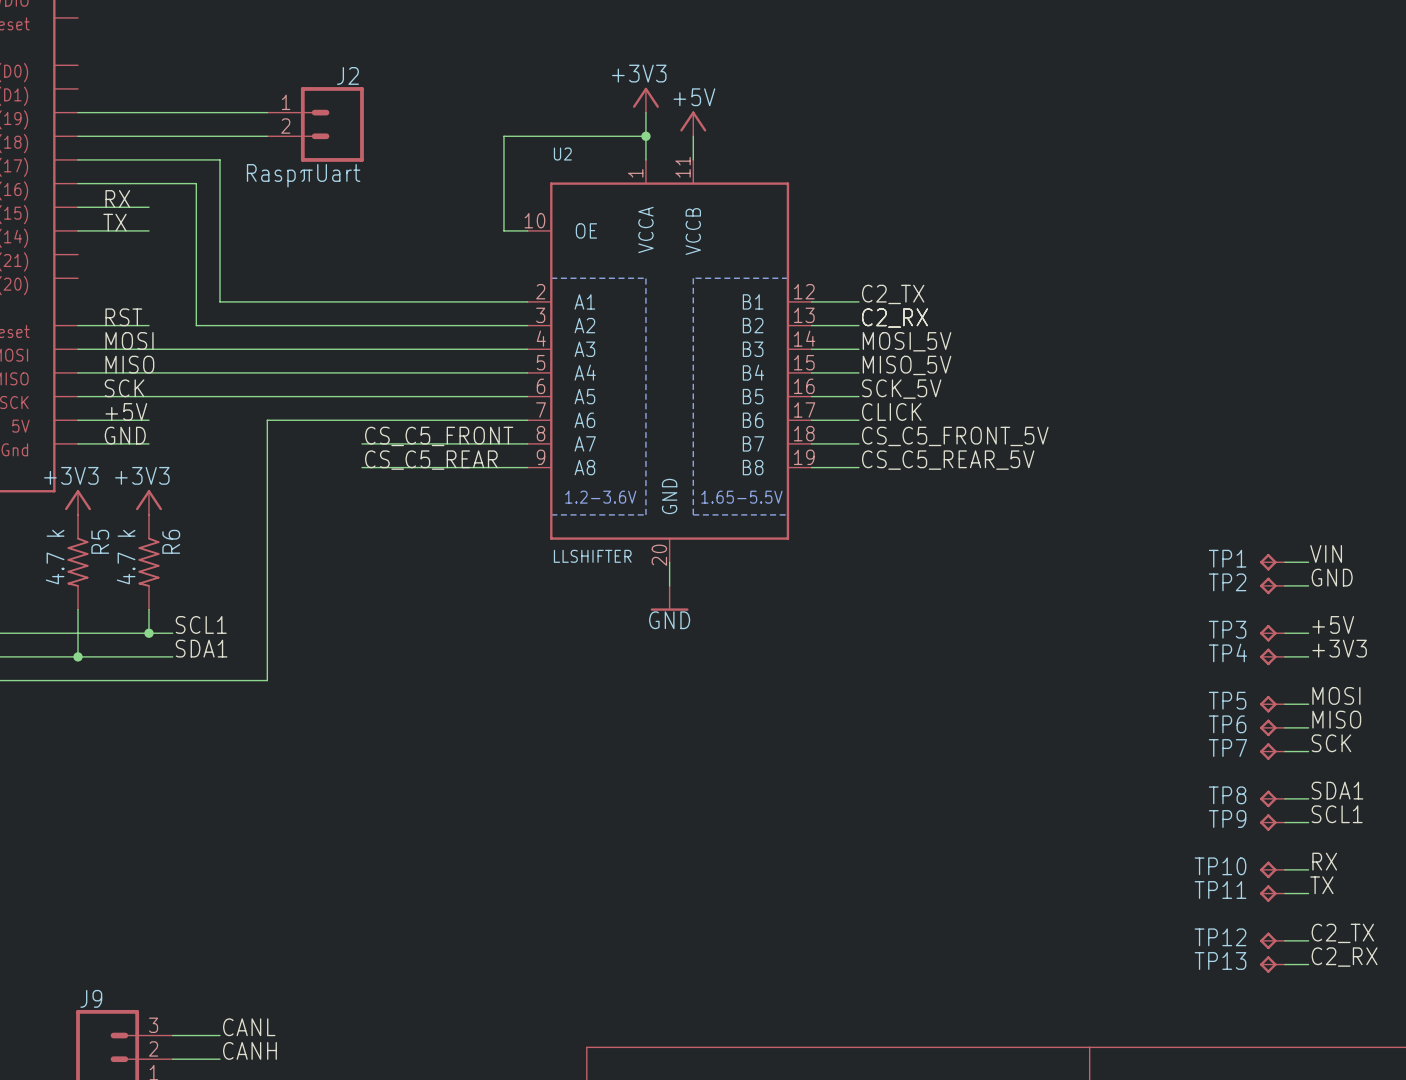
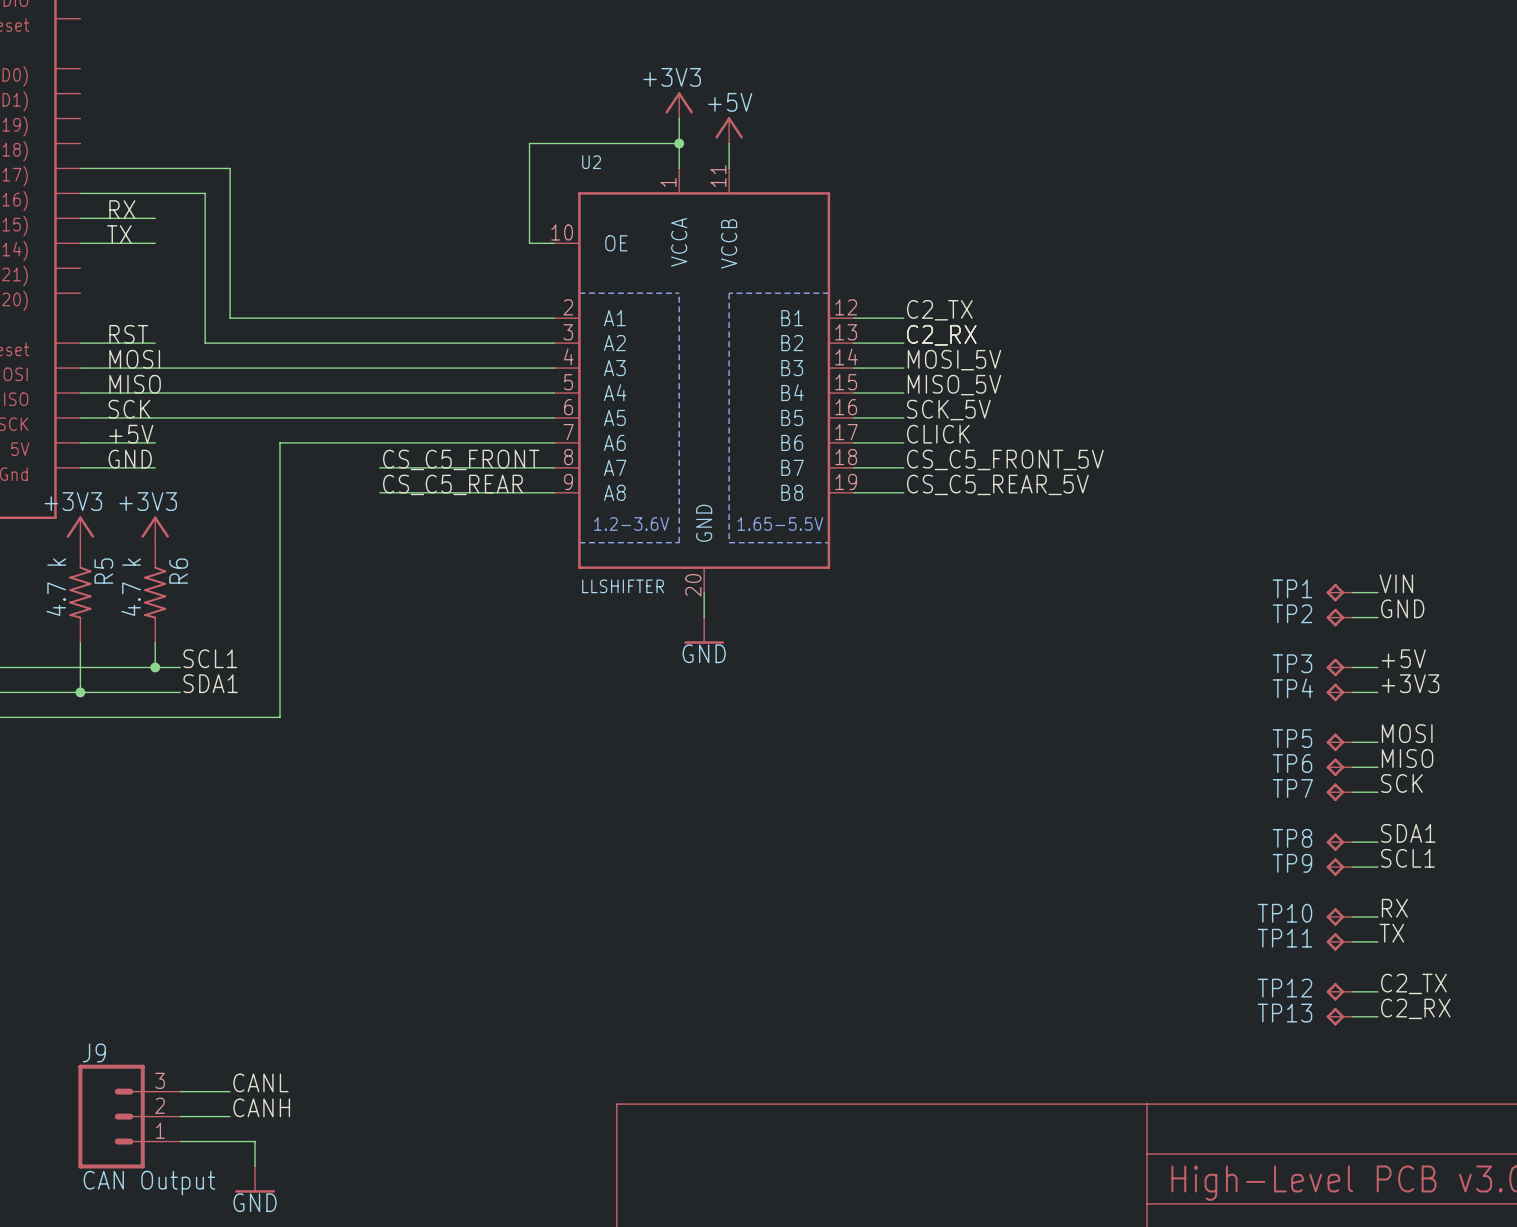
wire: (78, 112) (267, 112) -> none
J2: RaspπUart (315, 124) -> none
wire: (78, 136) (267, 136) -> none

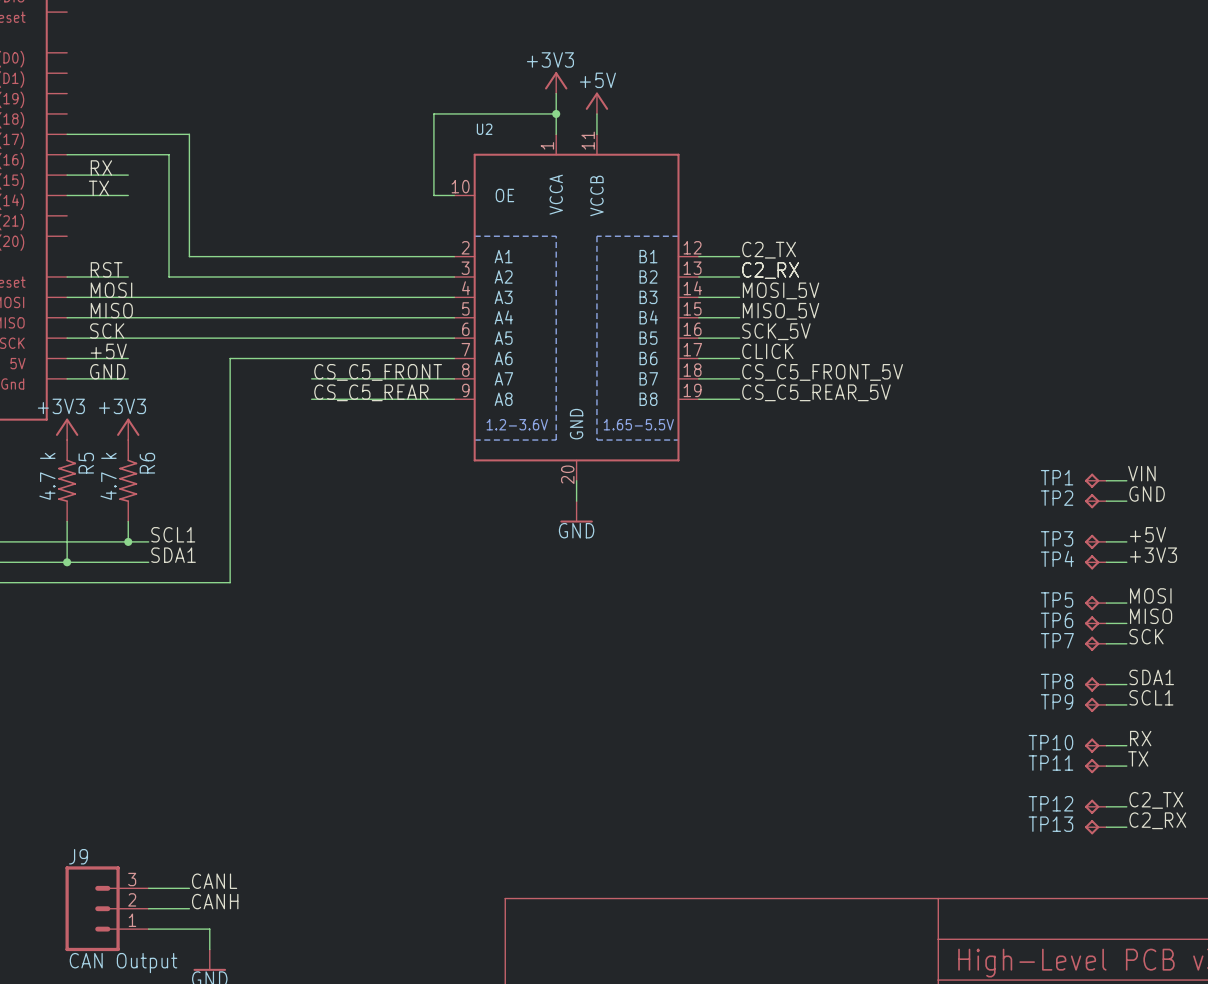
U2 value: LLSHIFTER (623, 586) -> none

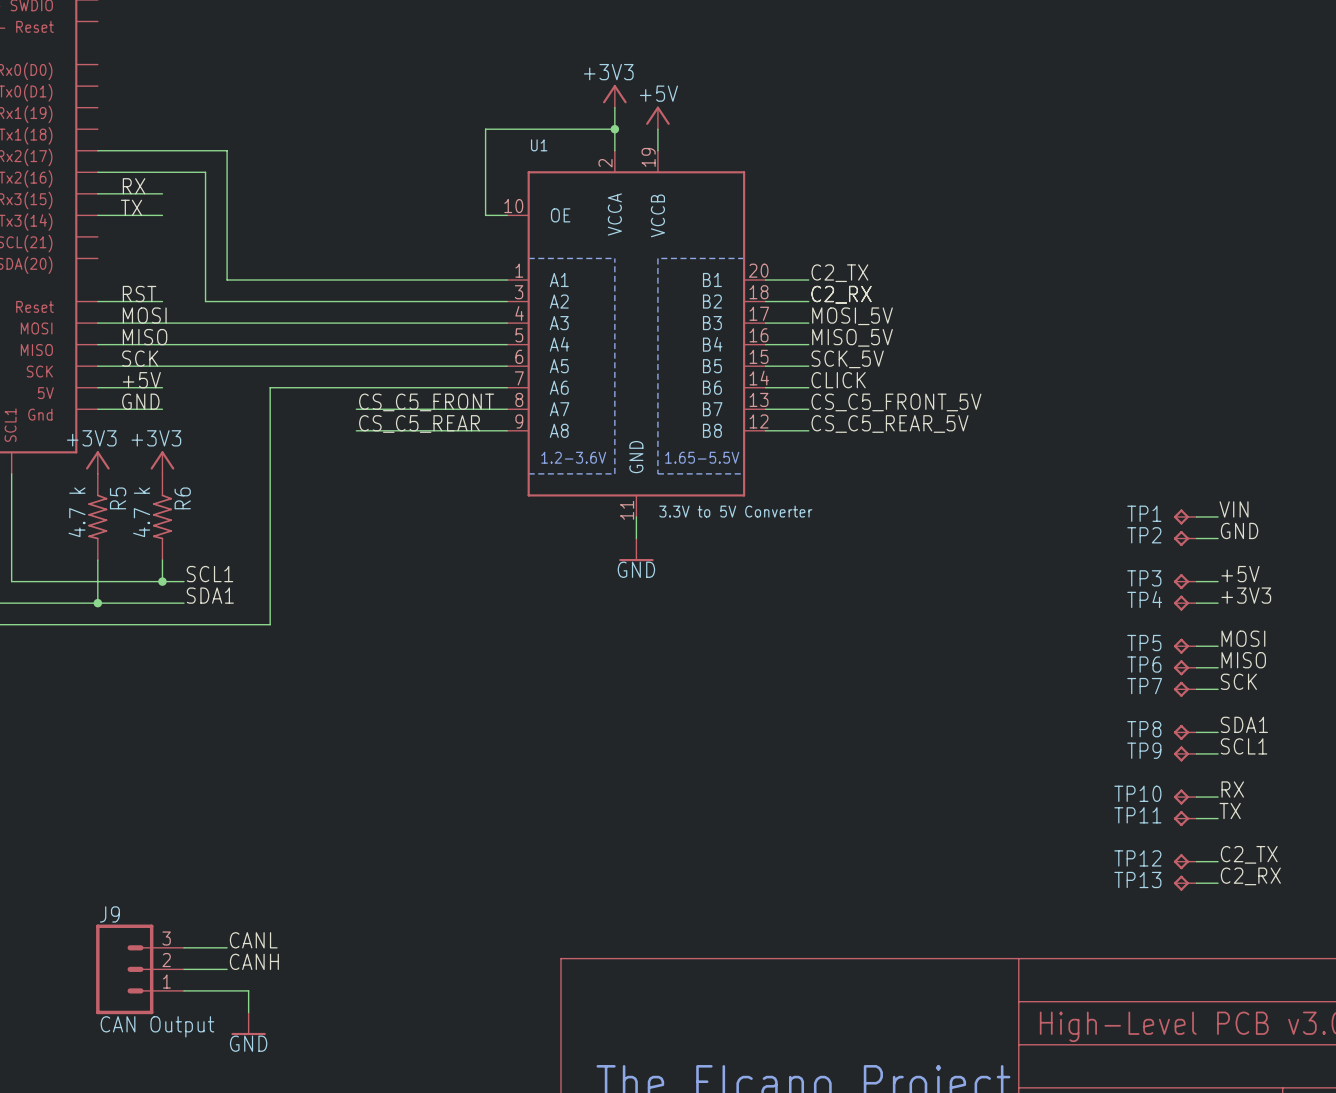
U2 name: U2 (484, 129) -> U1 (539, 145)
U2 symbol: [454, 134, 699, 481] -> [507, 150, 766, 517]
U2 value: none -> 3.3V to 5V Converter (735, 511)

